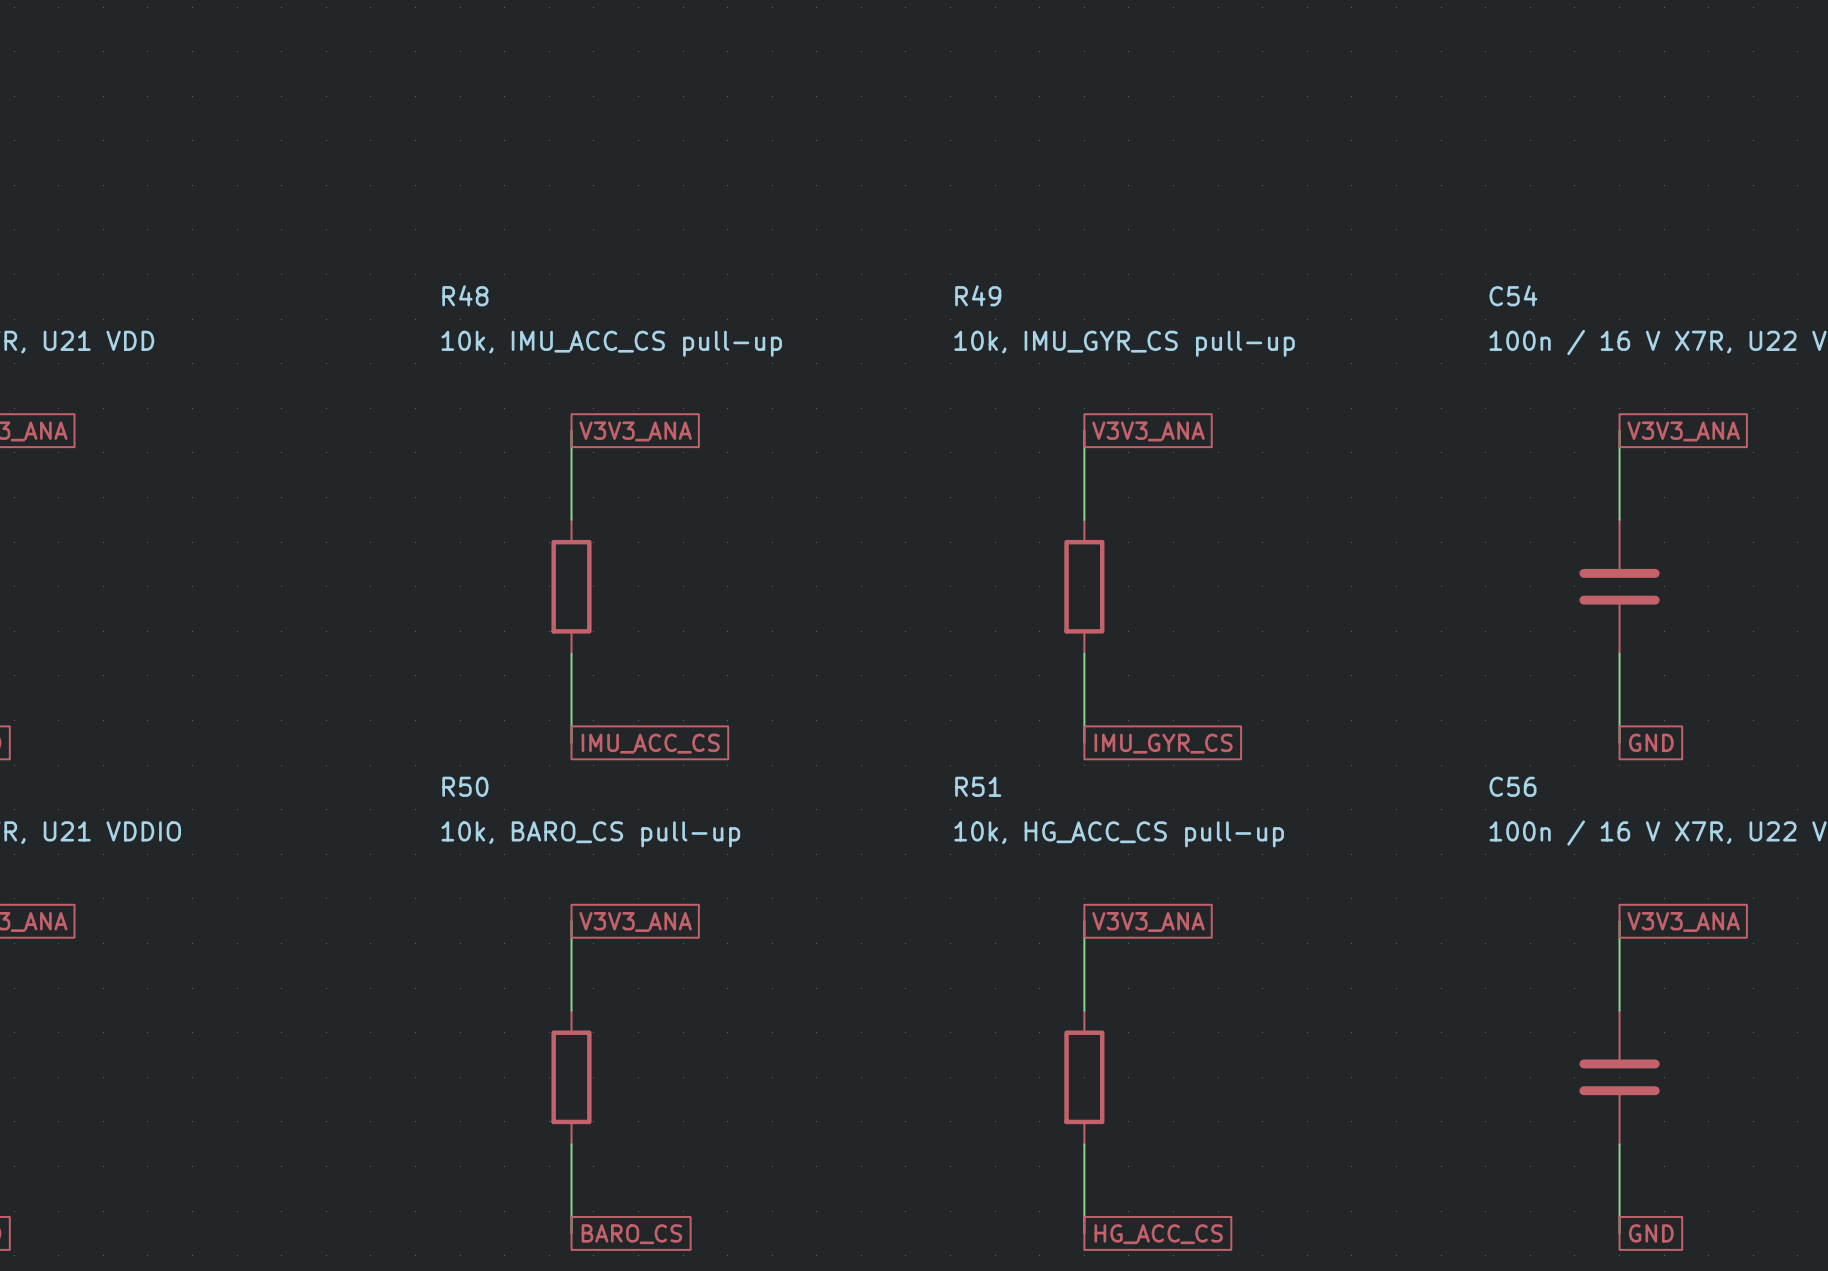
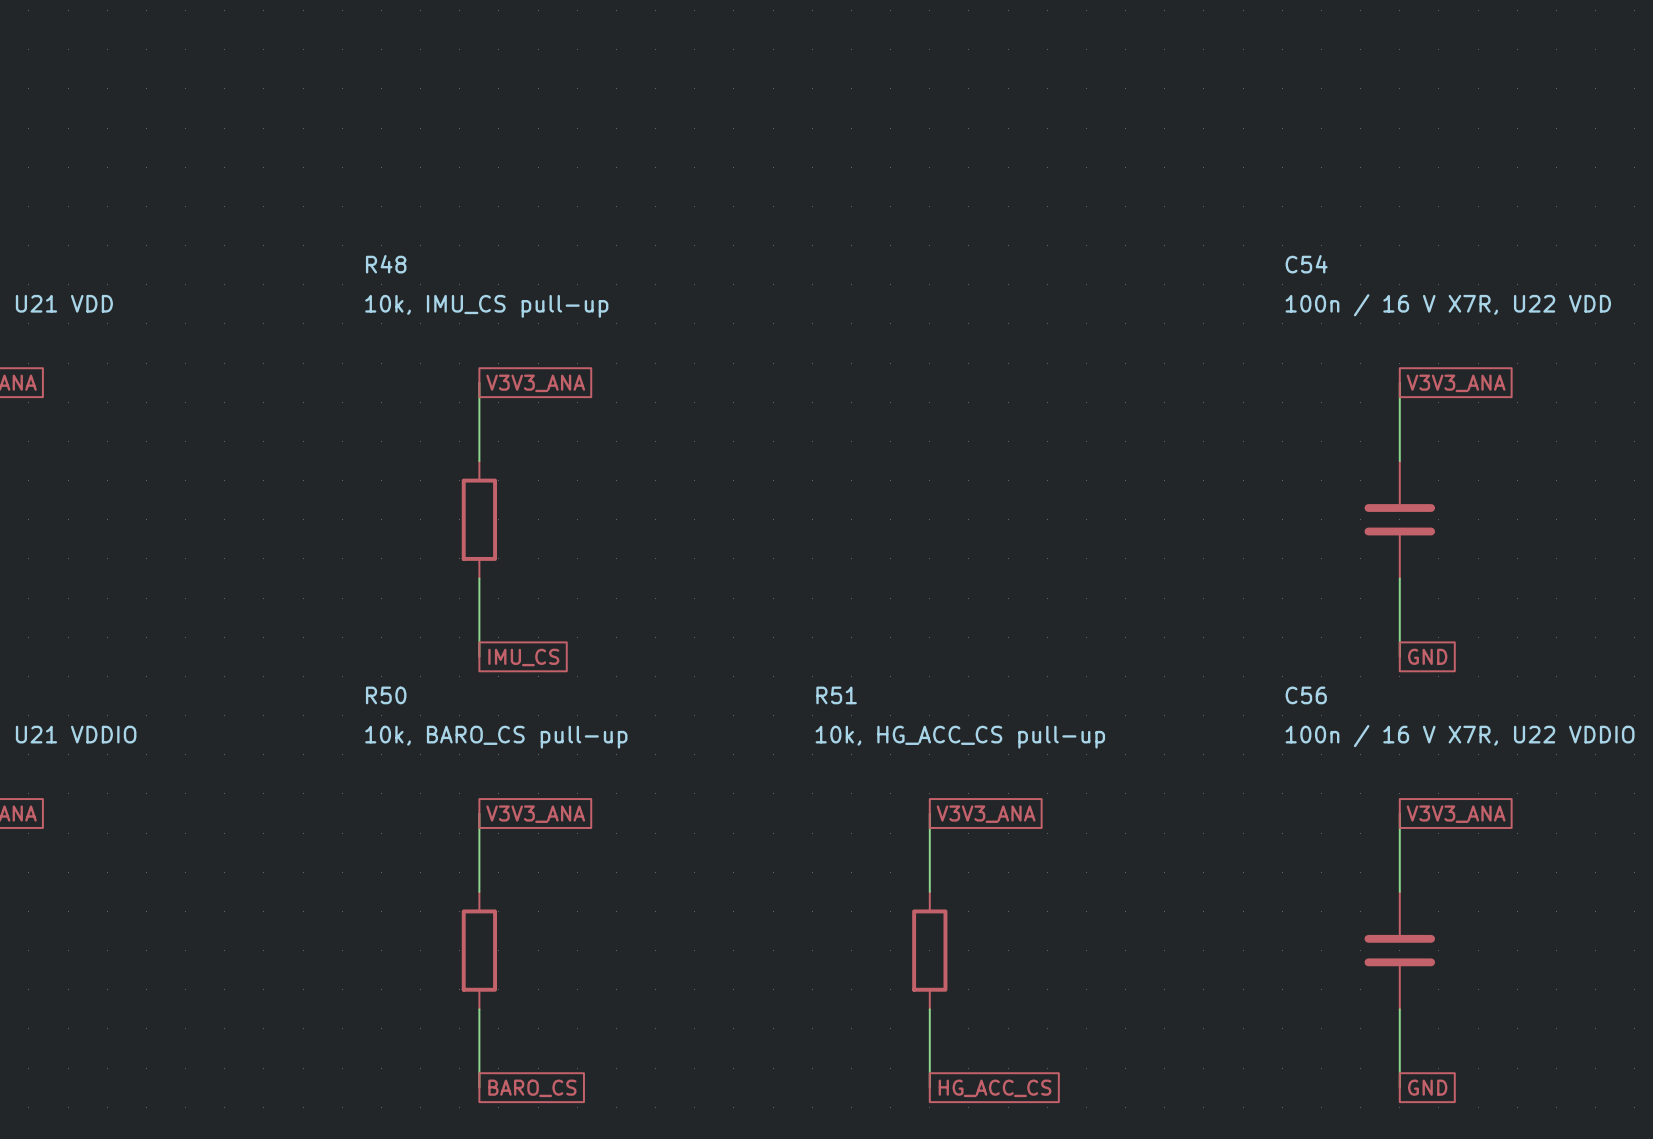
R48 value: 10k, IMU_ACC_CS pull-up (611, 343) -> 10k, IMU_CS pull-up (486, 306)
wire: (1084, 430) (1084, 519) -> none
global label: V3V3_ANA (1148, 431) -> none
R49: 10k, IMU_GYR_CS pull-up (1084, 586) -> none
wire: (1084, 653) (1084, 742) -> none
global label: IMU_ACC_CS (650, 743) -> IMU_CS (523, 657)
global label: IMU_GYR_CS (1163, 743) -> none

